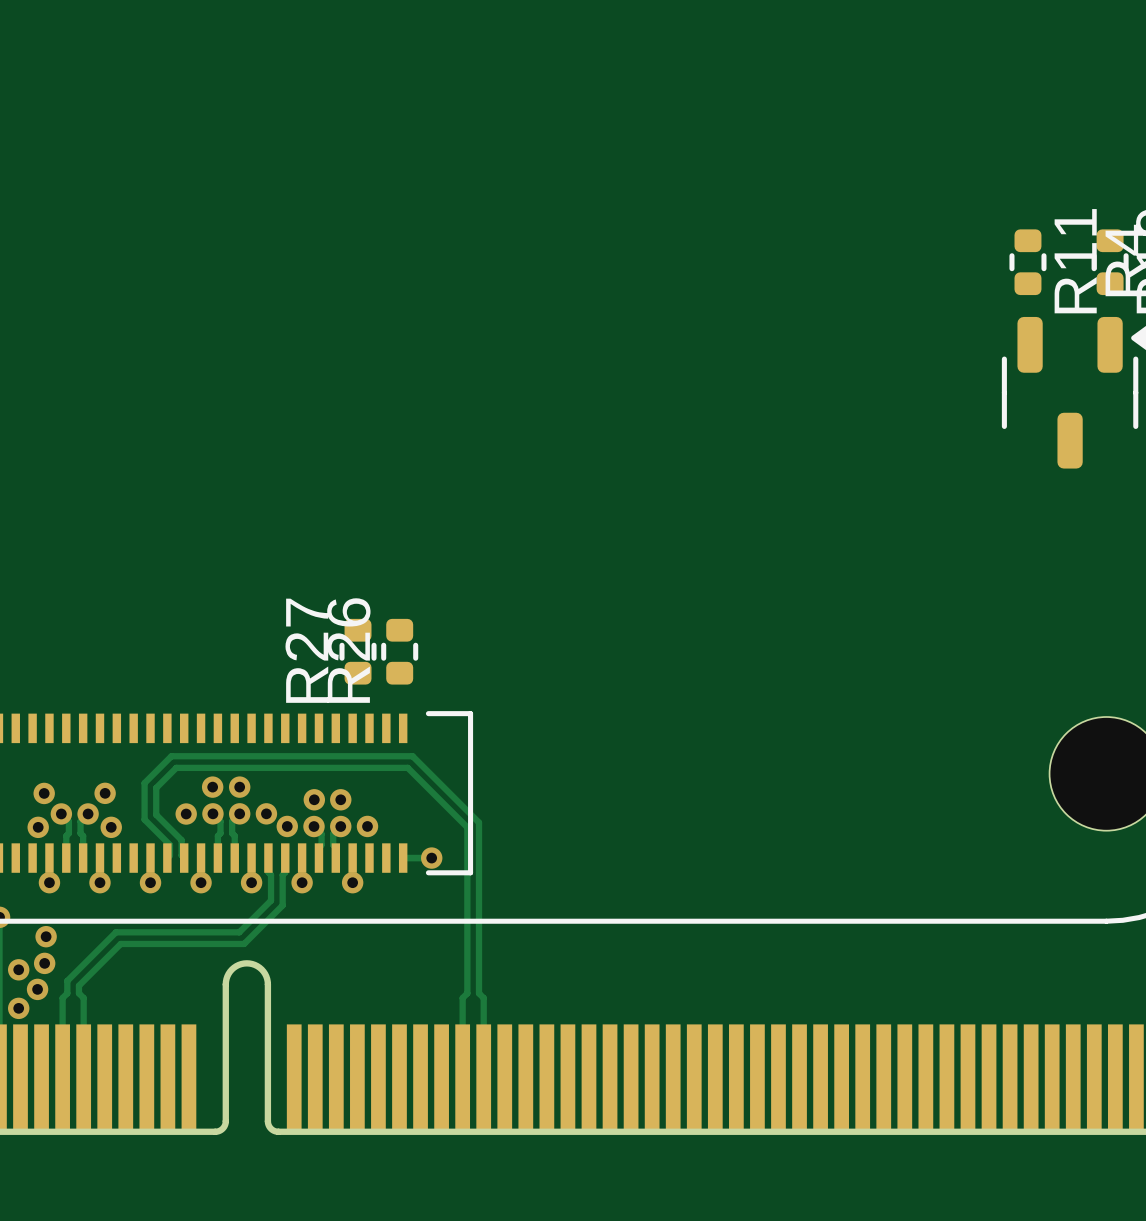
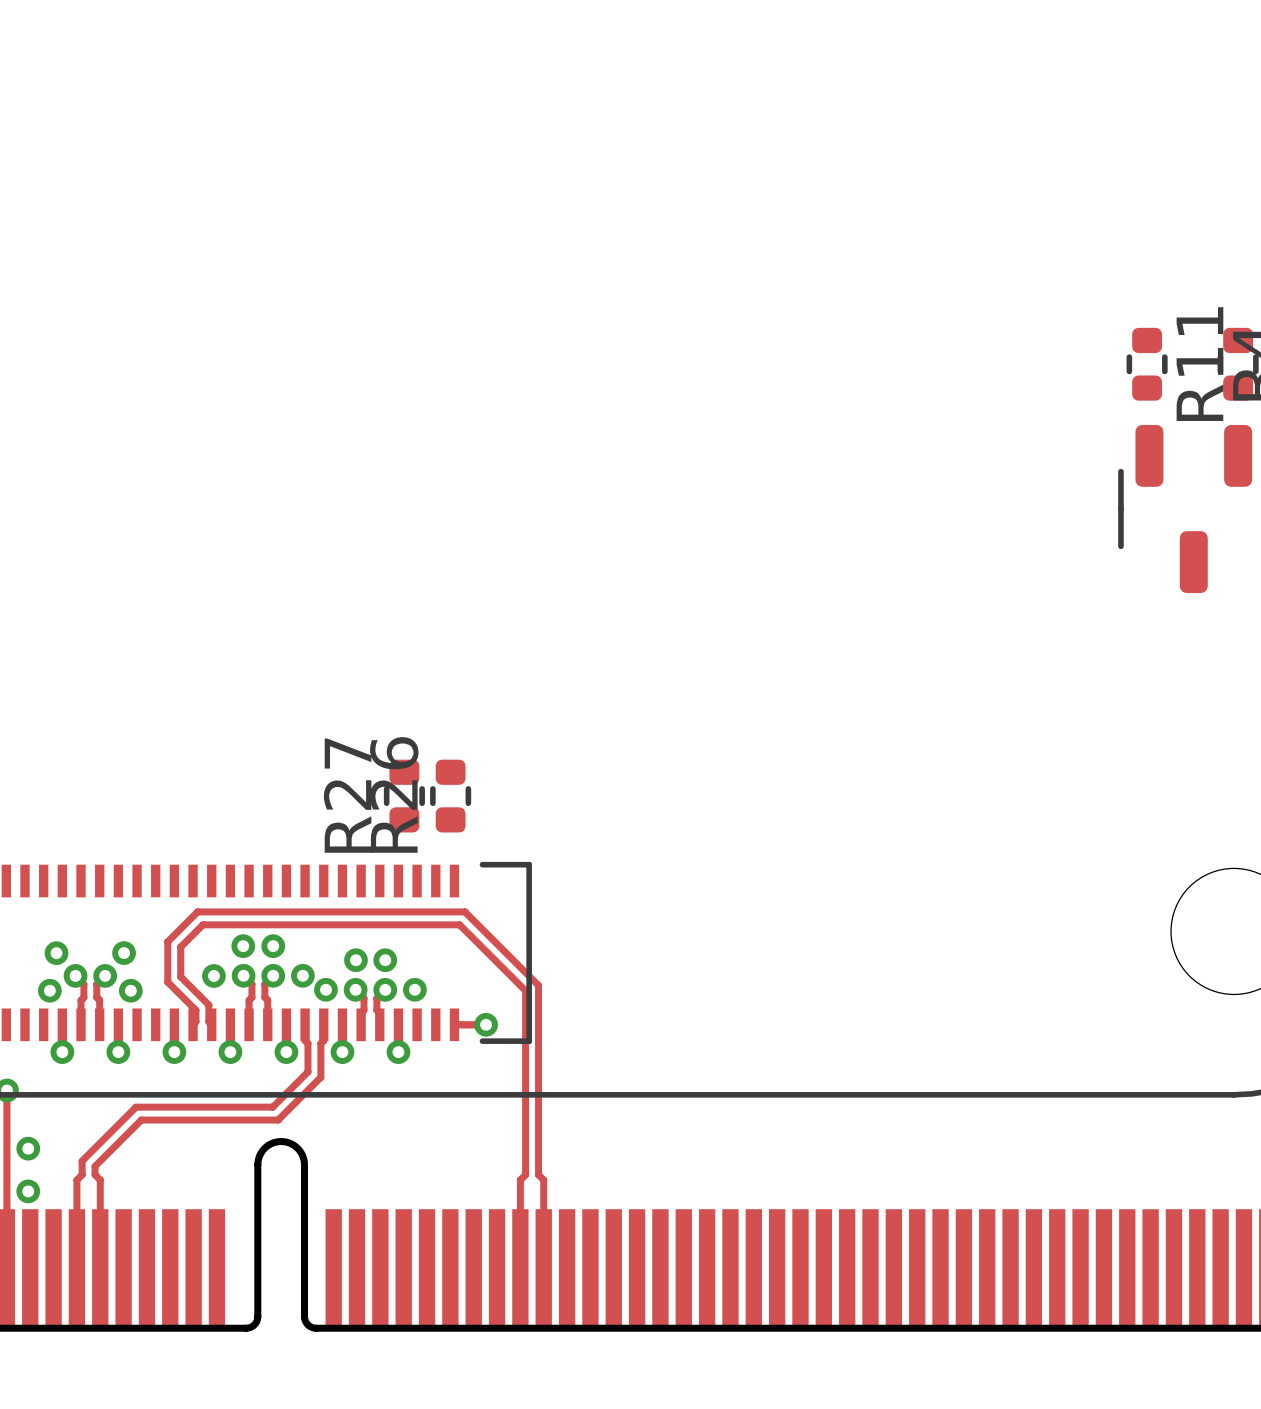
via: (46, 936) -> none
via: (44, 963) -> none
via: (37, 989) -> none

